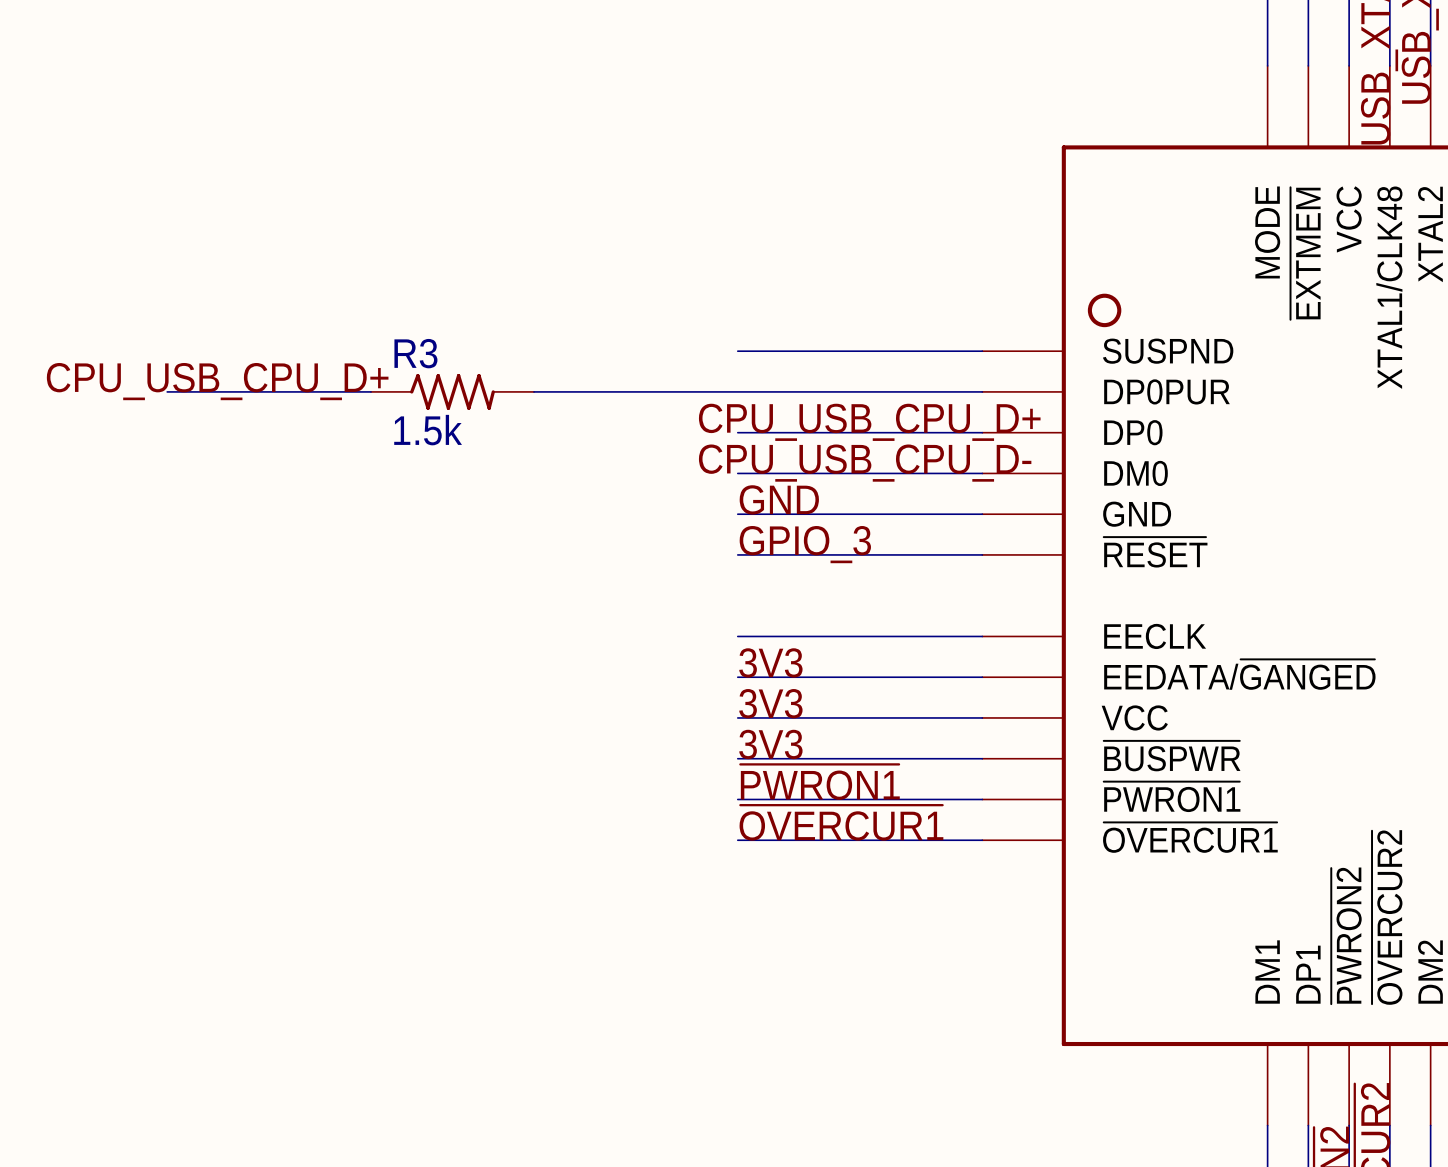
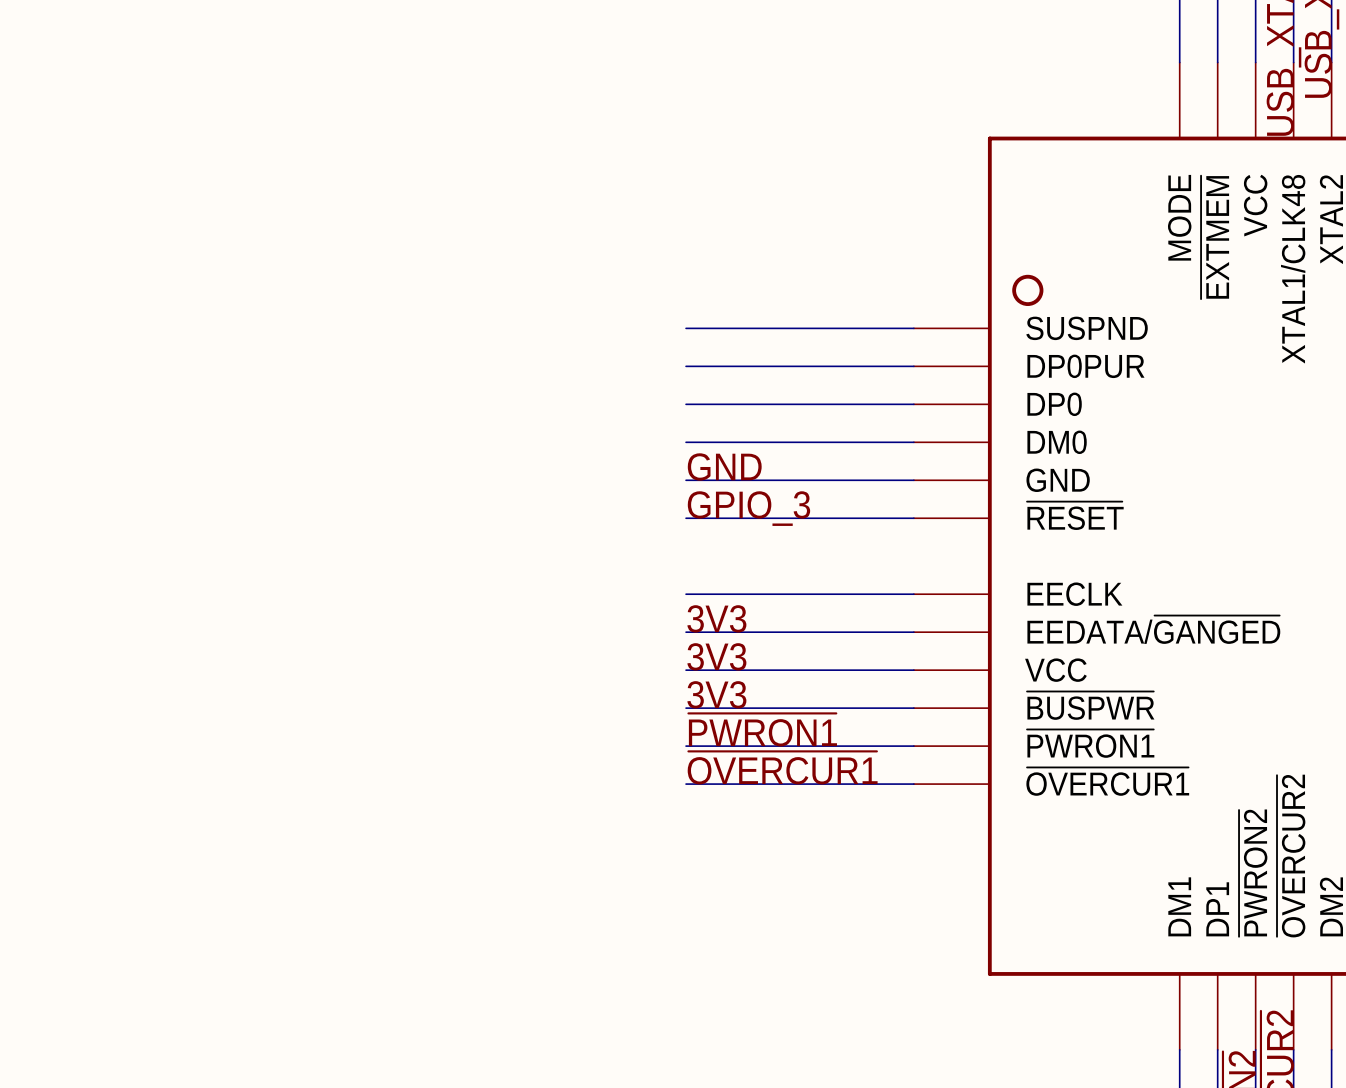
label: CPU_USB_CPU_D+ (217, 381) -> none
wire: (167, 391) (371, 391) -> none
R3: 1.5k (452, 391) -> none
wire: (534, 391) (737, 391) -> none
label: CPU_USB_CPU_D+ (869, 422) -> none
label: CPU_USB_CPU_D- (865, 463) -> none

